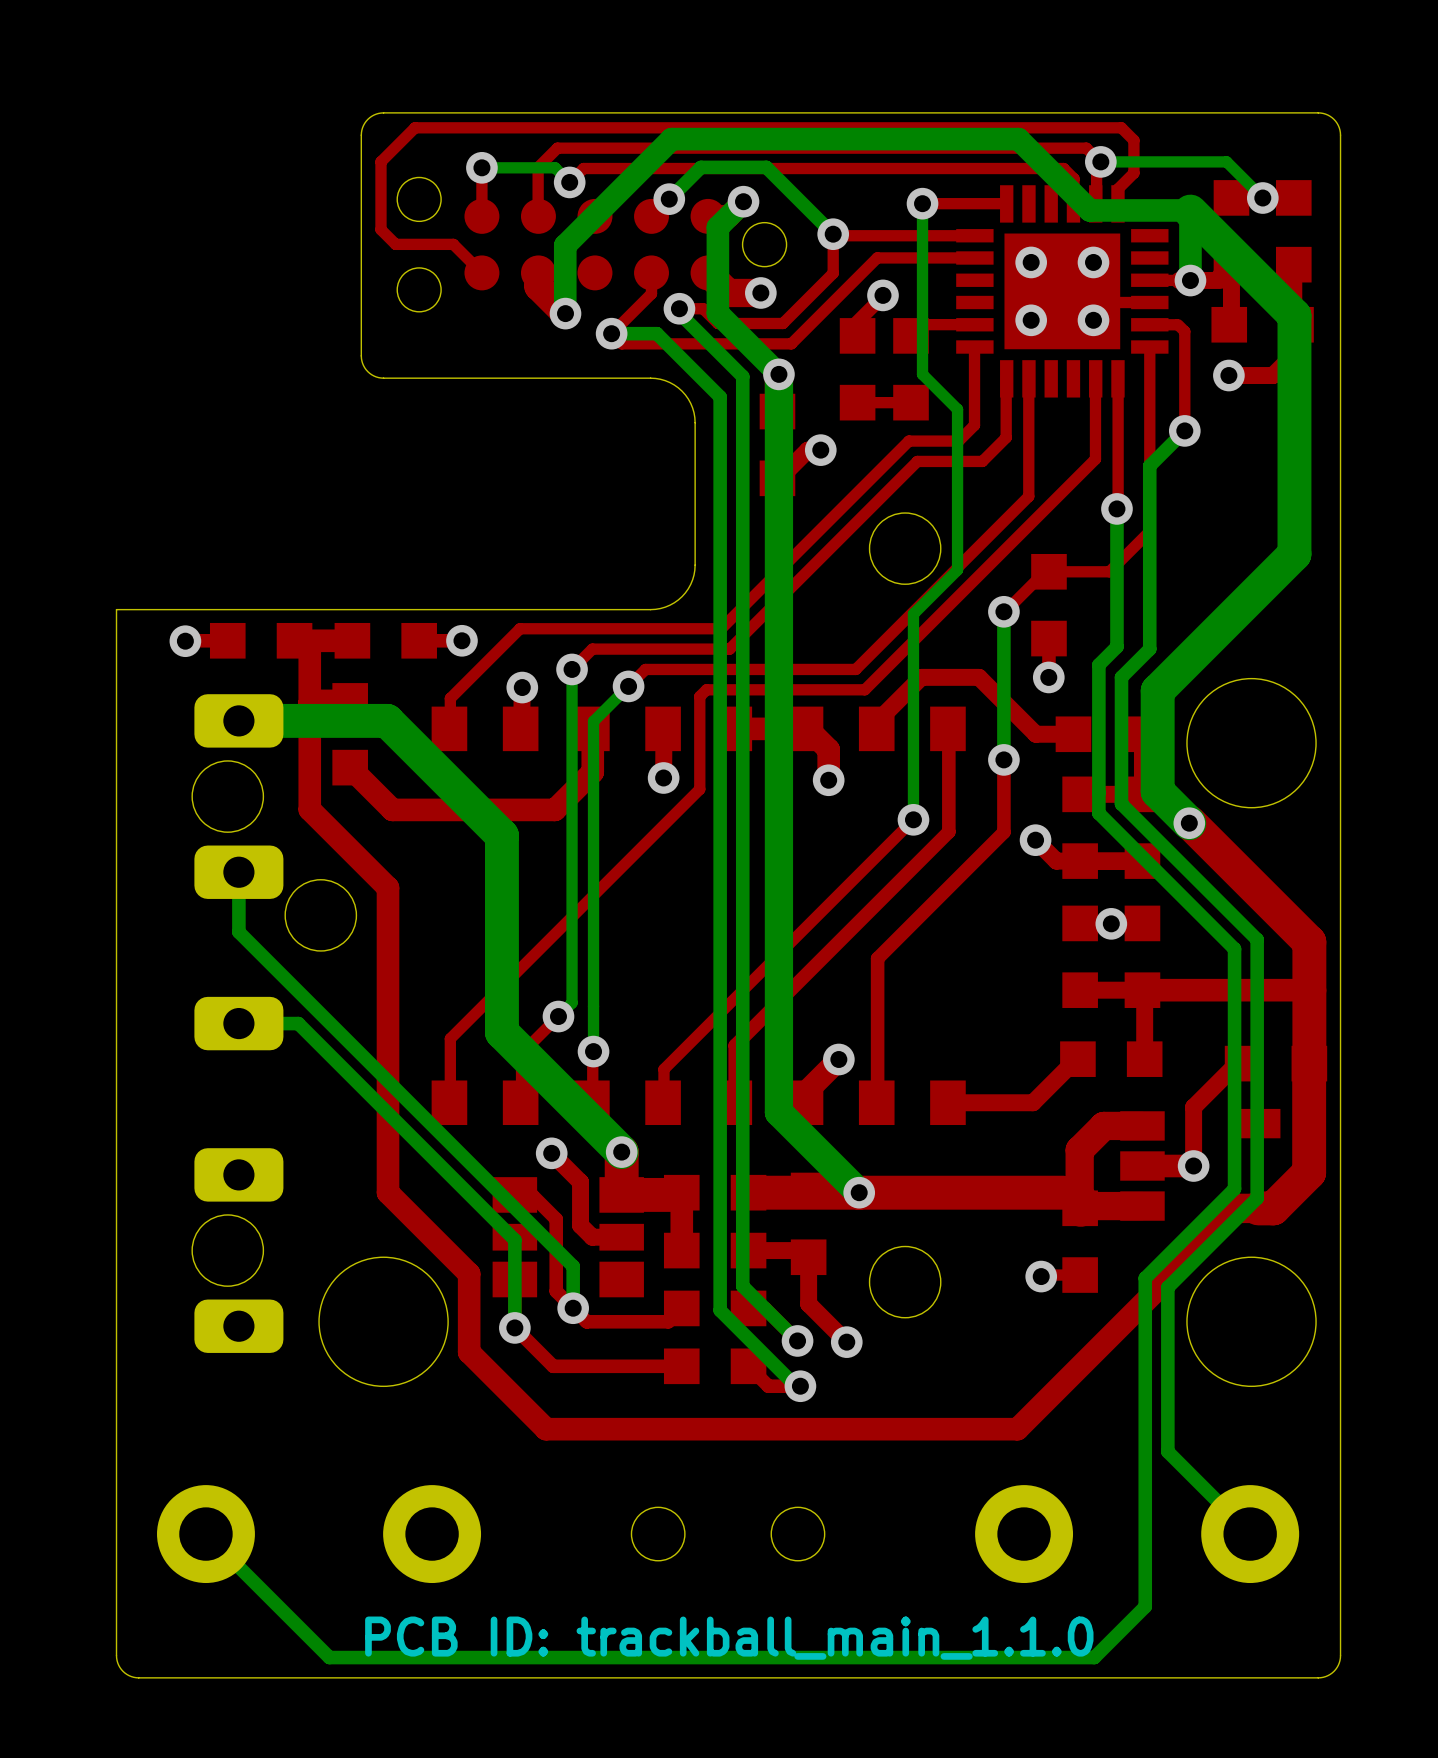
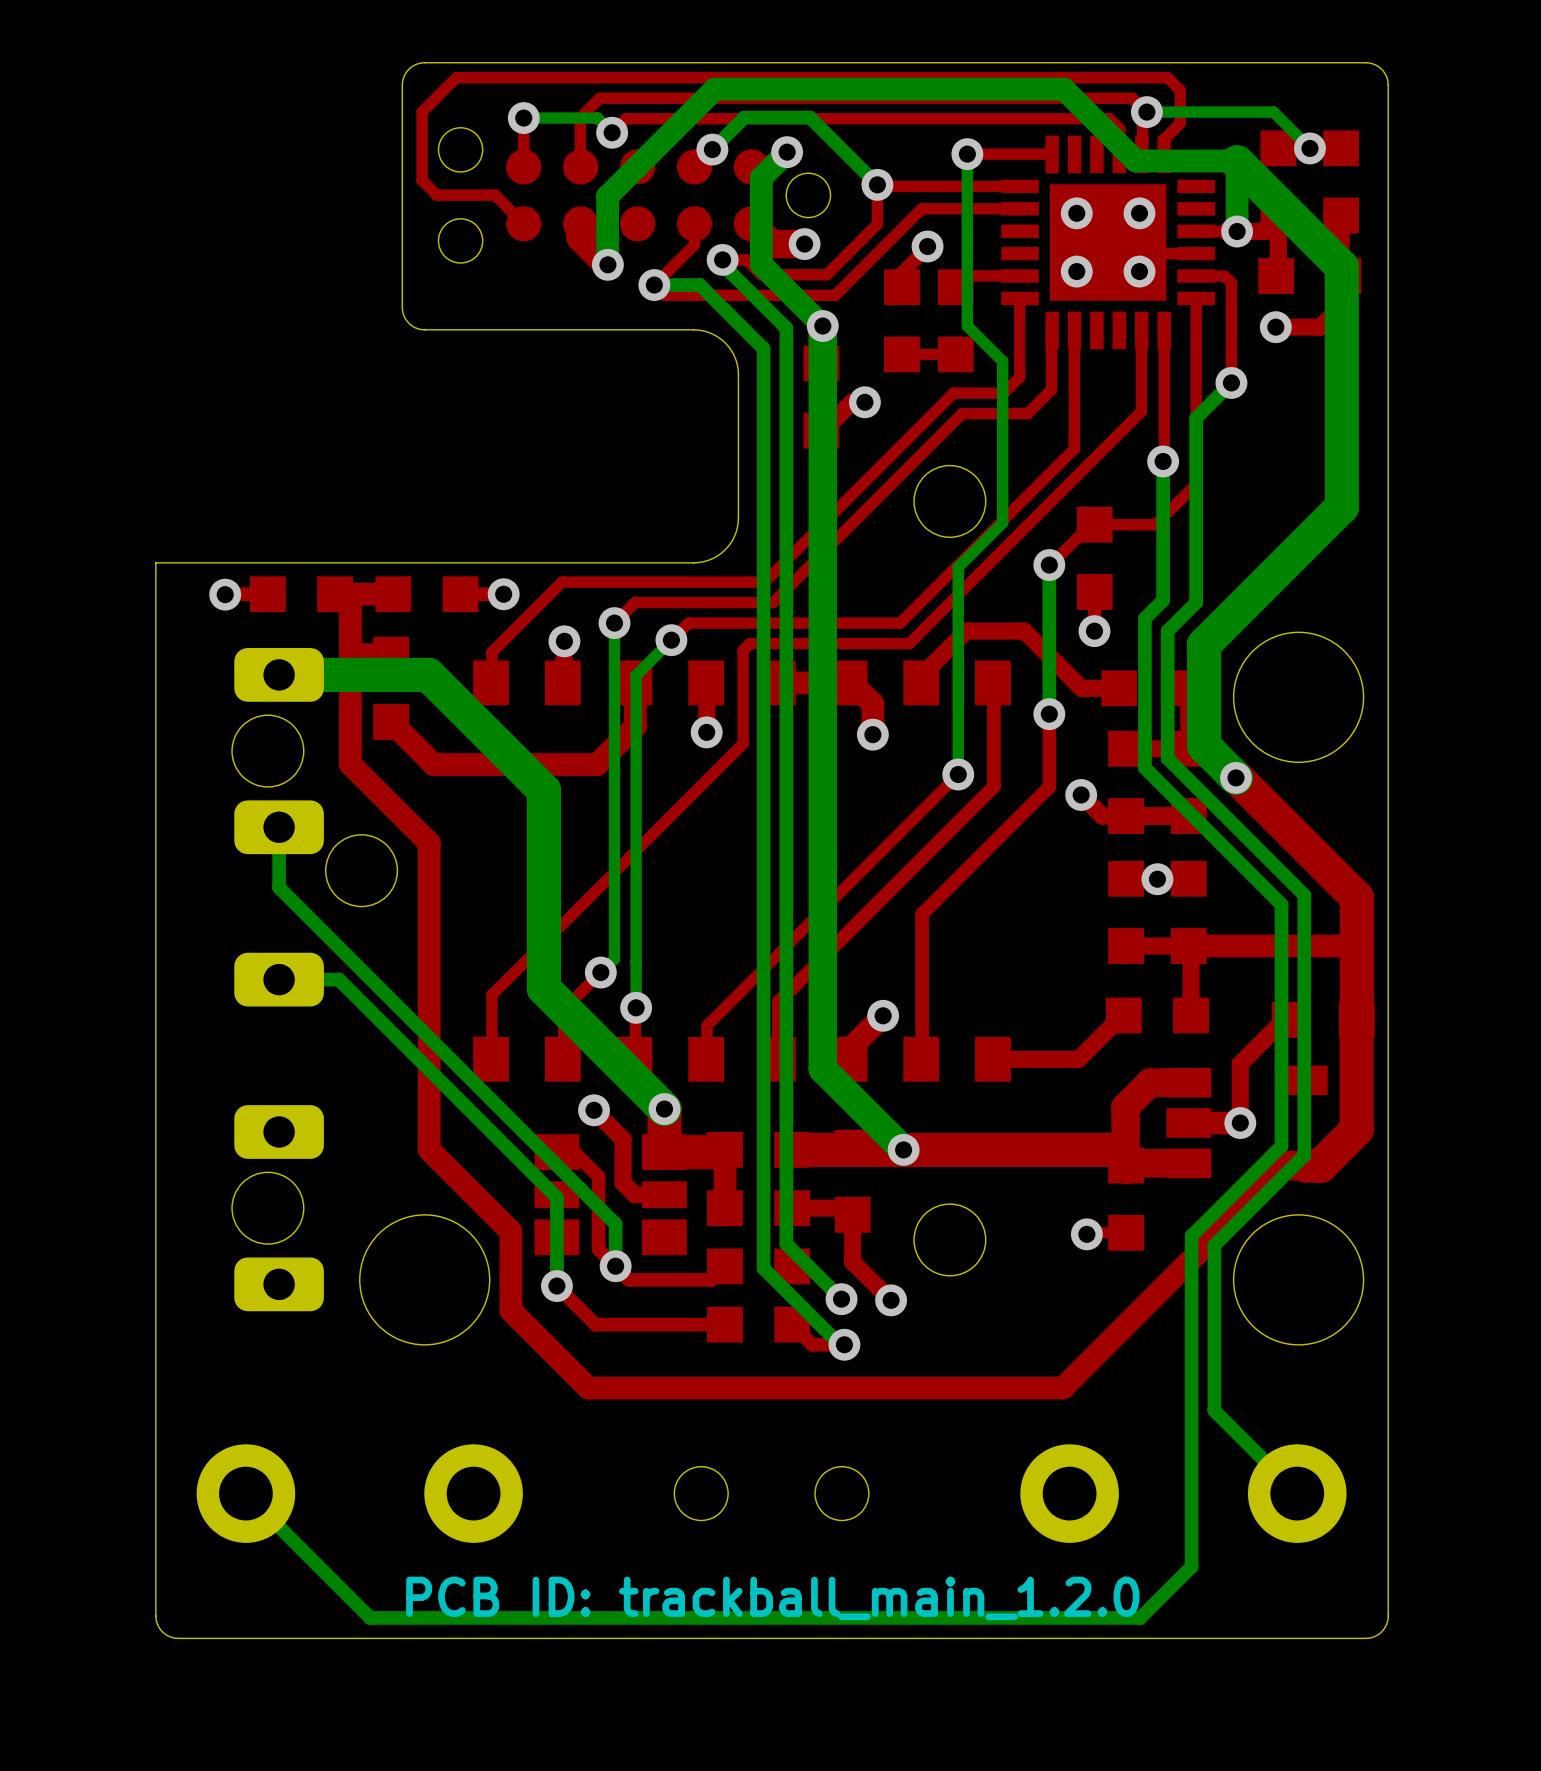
text: PCB ID: trackball_main_1.1.0 (729, 1638) -> PCB ID: trackball_main_1.2.0 (772, 1598)

